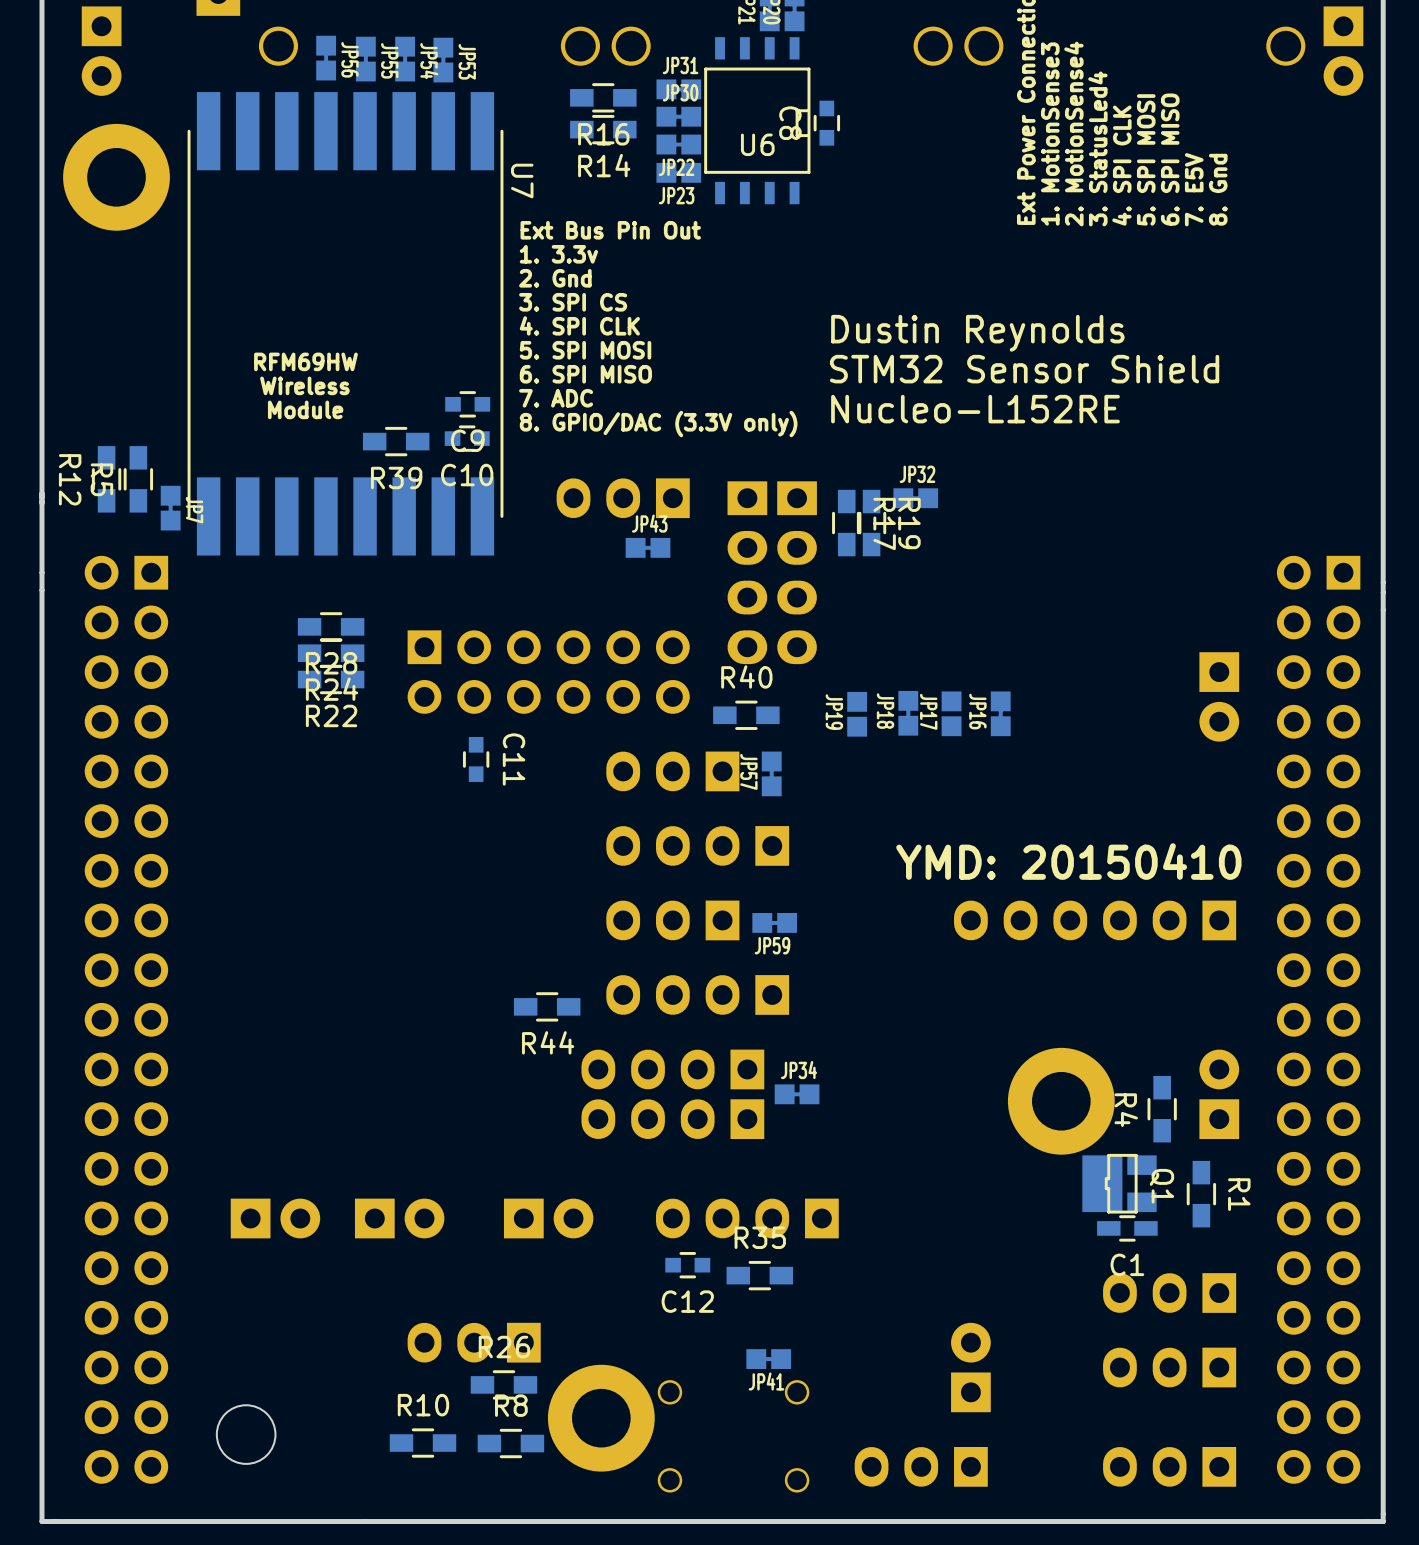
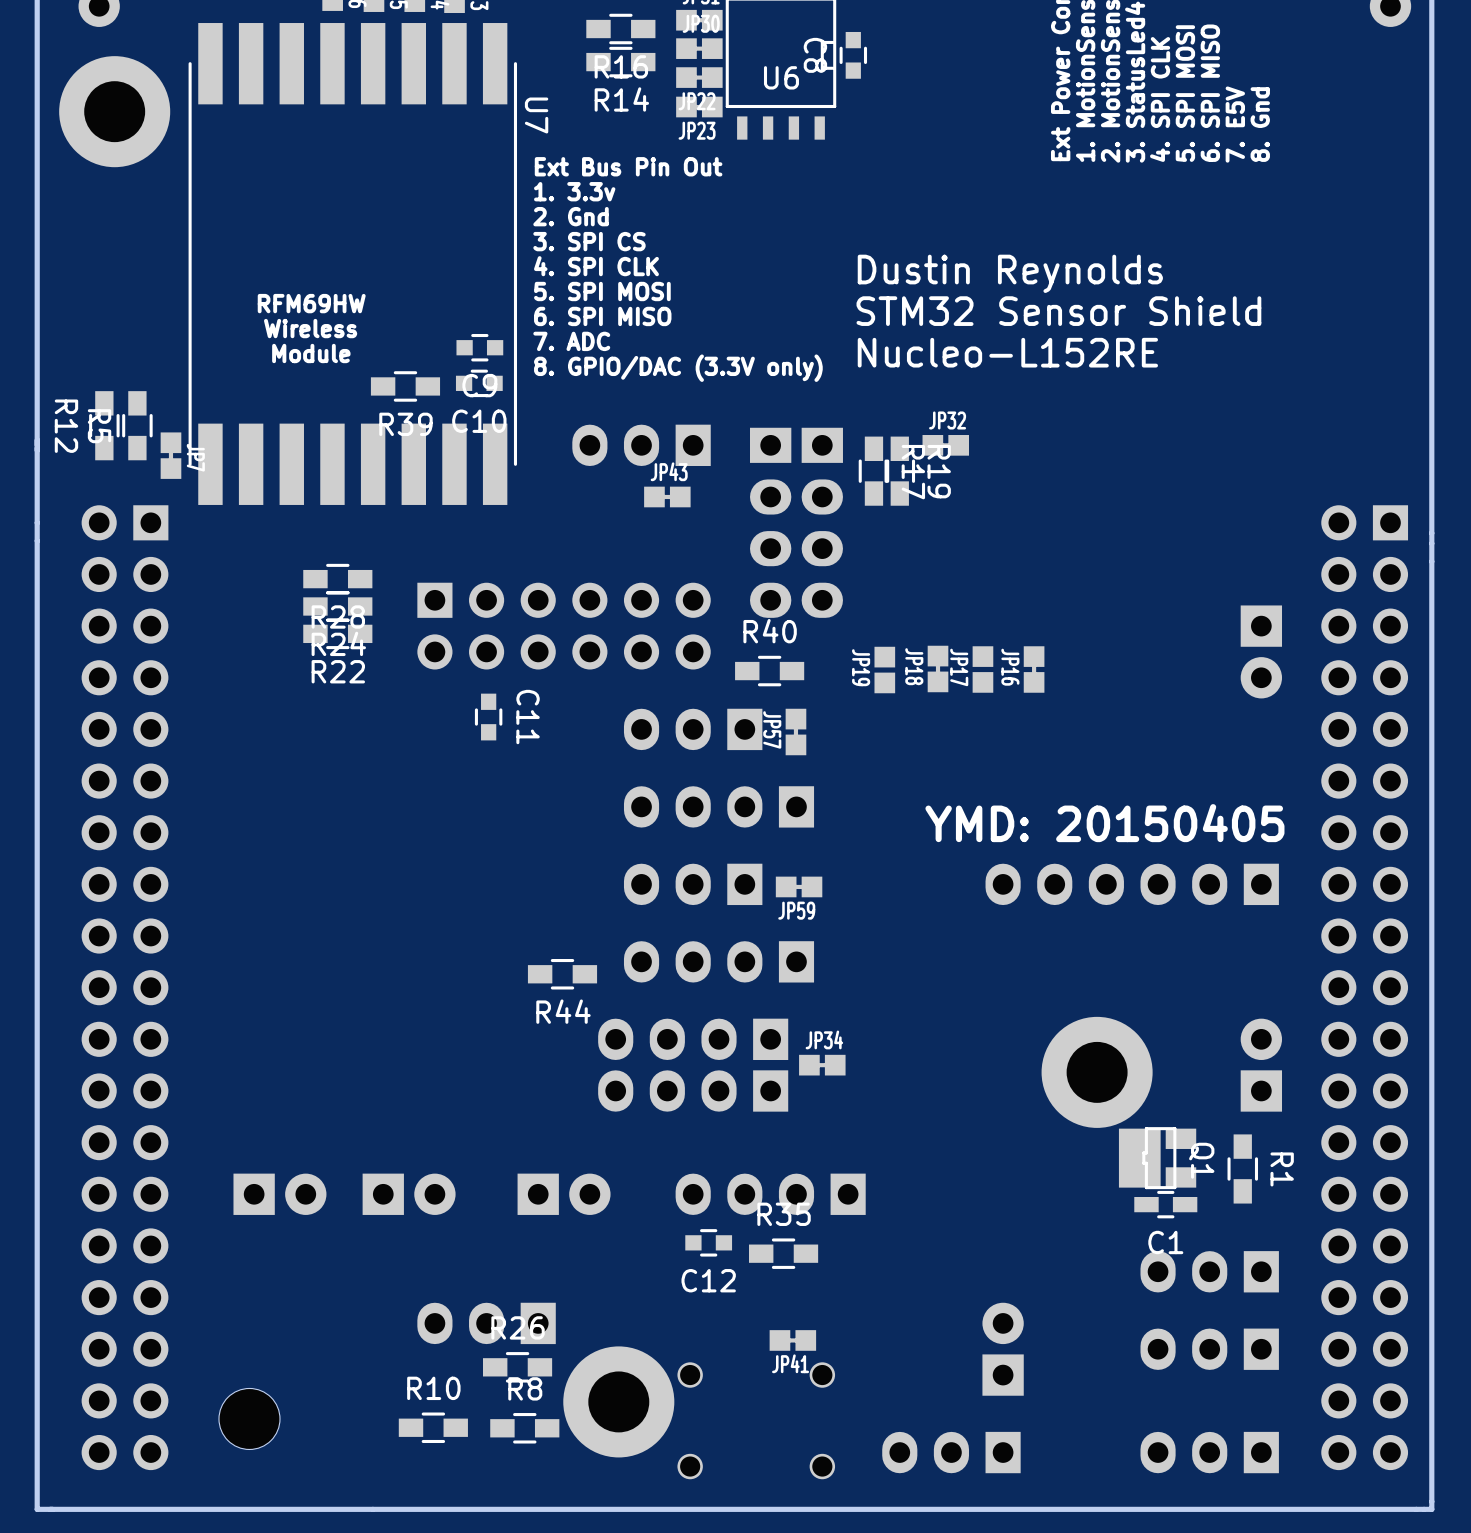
text: YMD: 20150410 (1068, 861) -> YMD: 20150405 (1104, 823)
R4: (1162, 1109) -> none

